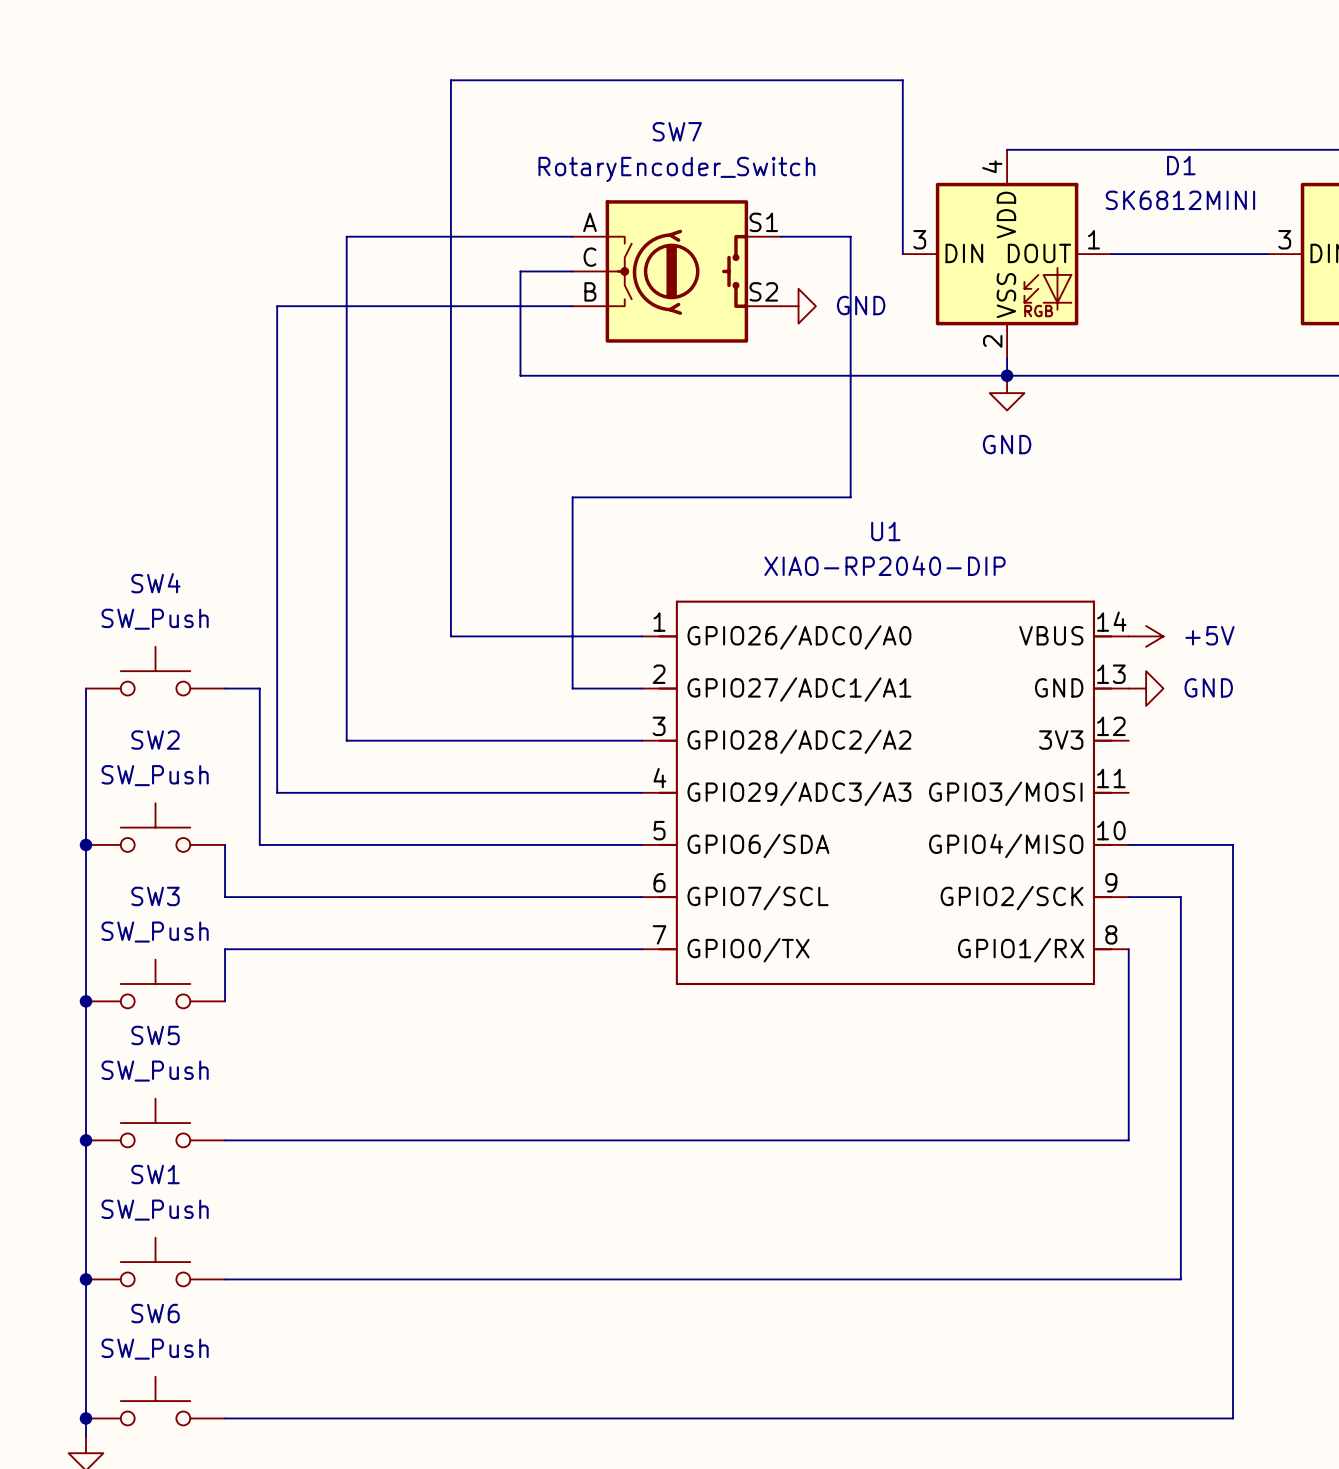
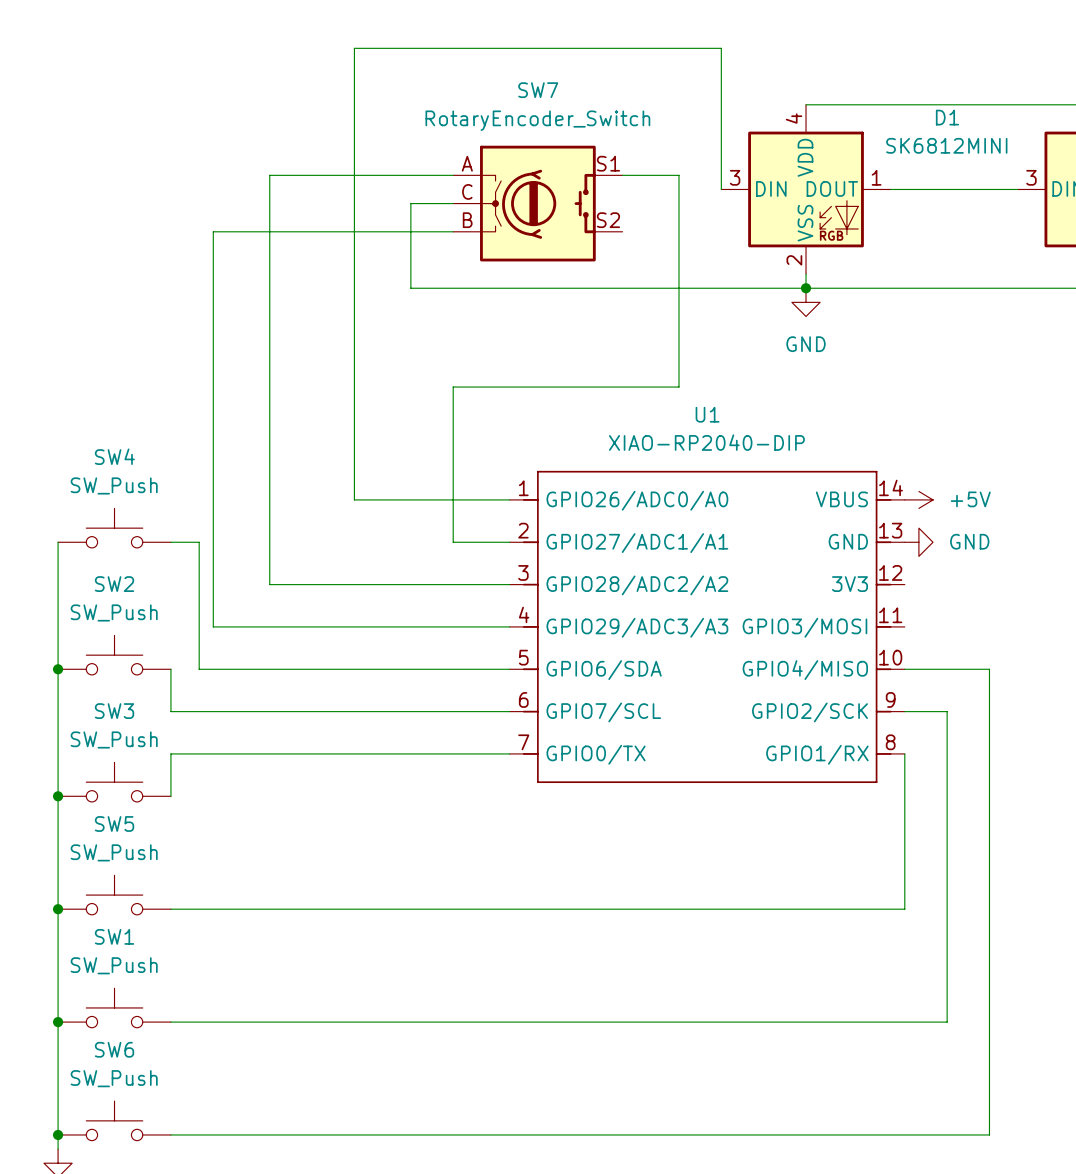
power symbol: GND (798, 306) -> none

